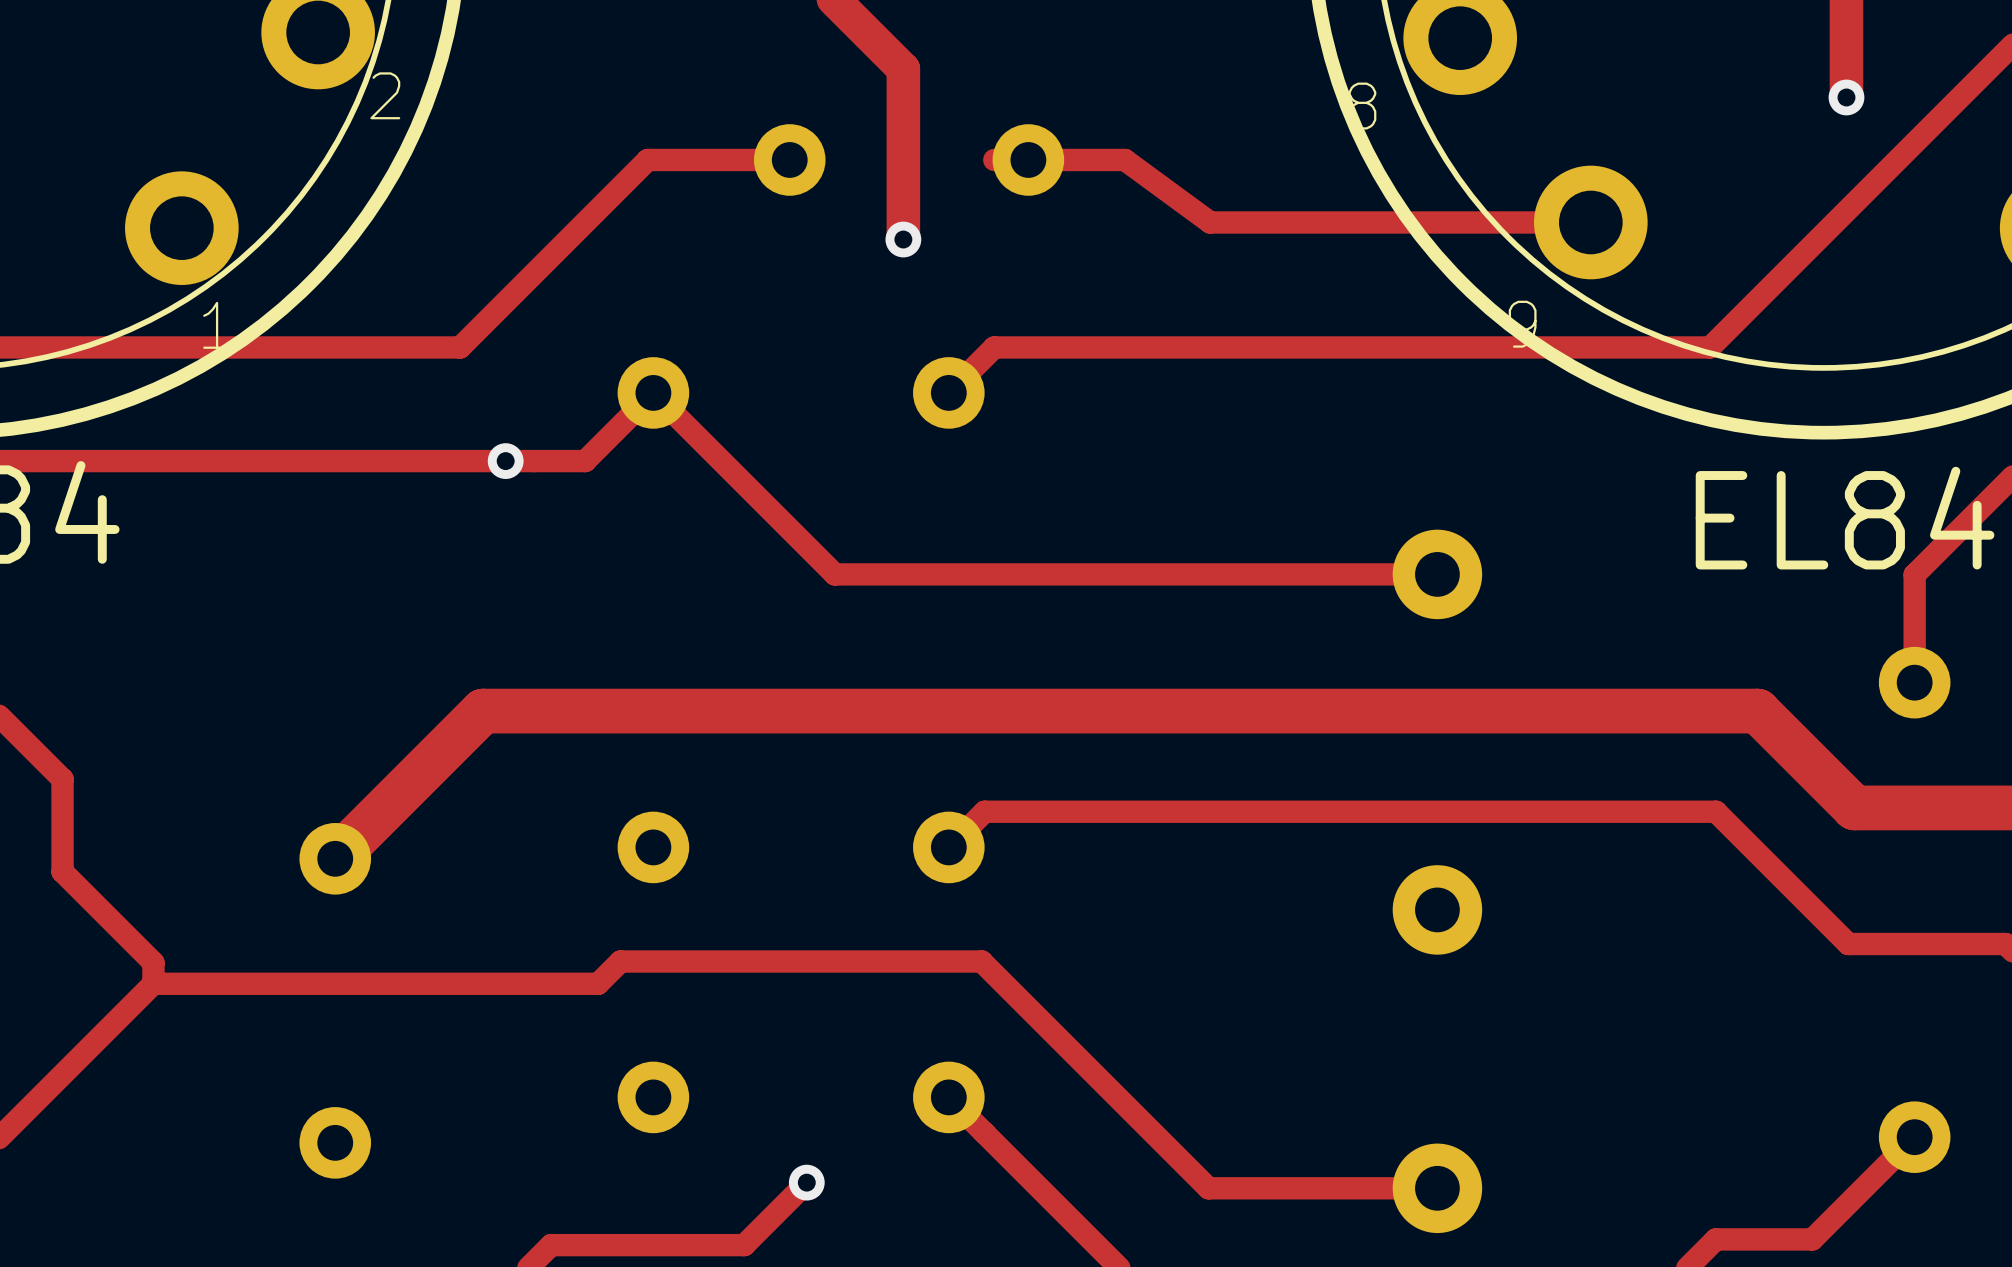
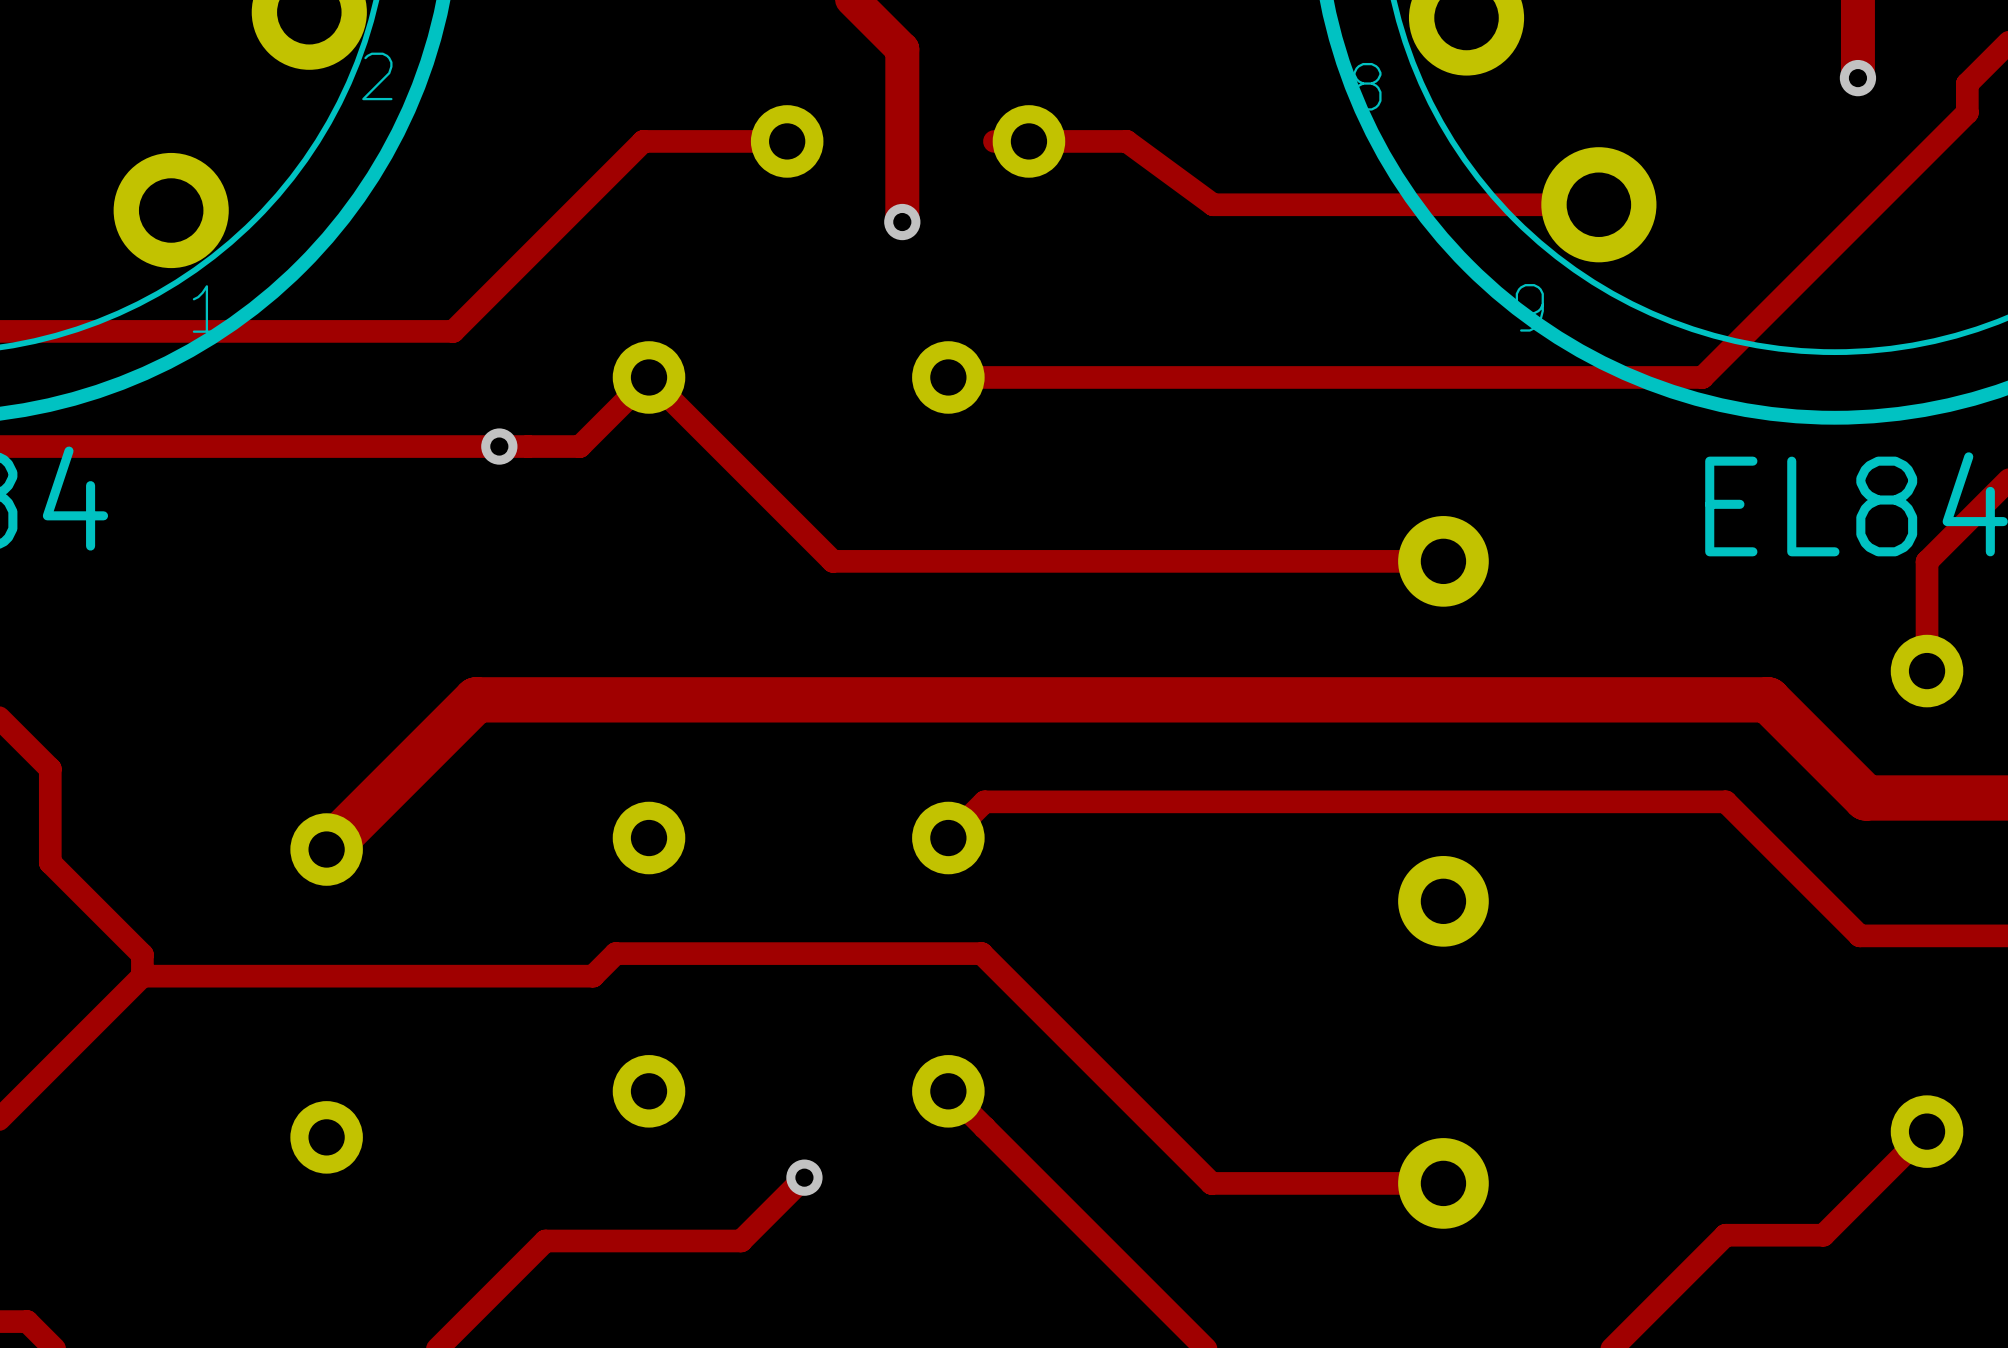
track: (1954, 103) (1710, 347) (994, 347) (948, 392) -> (1967, 83) (1967, 112) (1702, 377) (948, 377)

